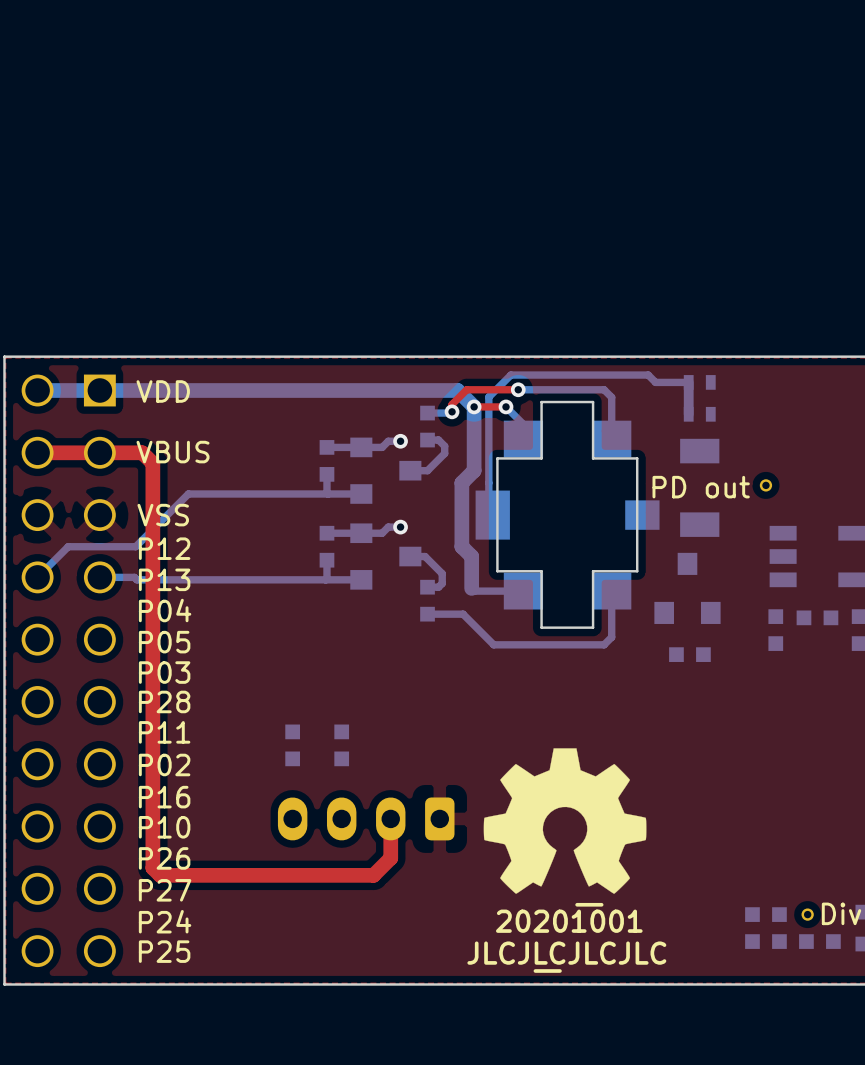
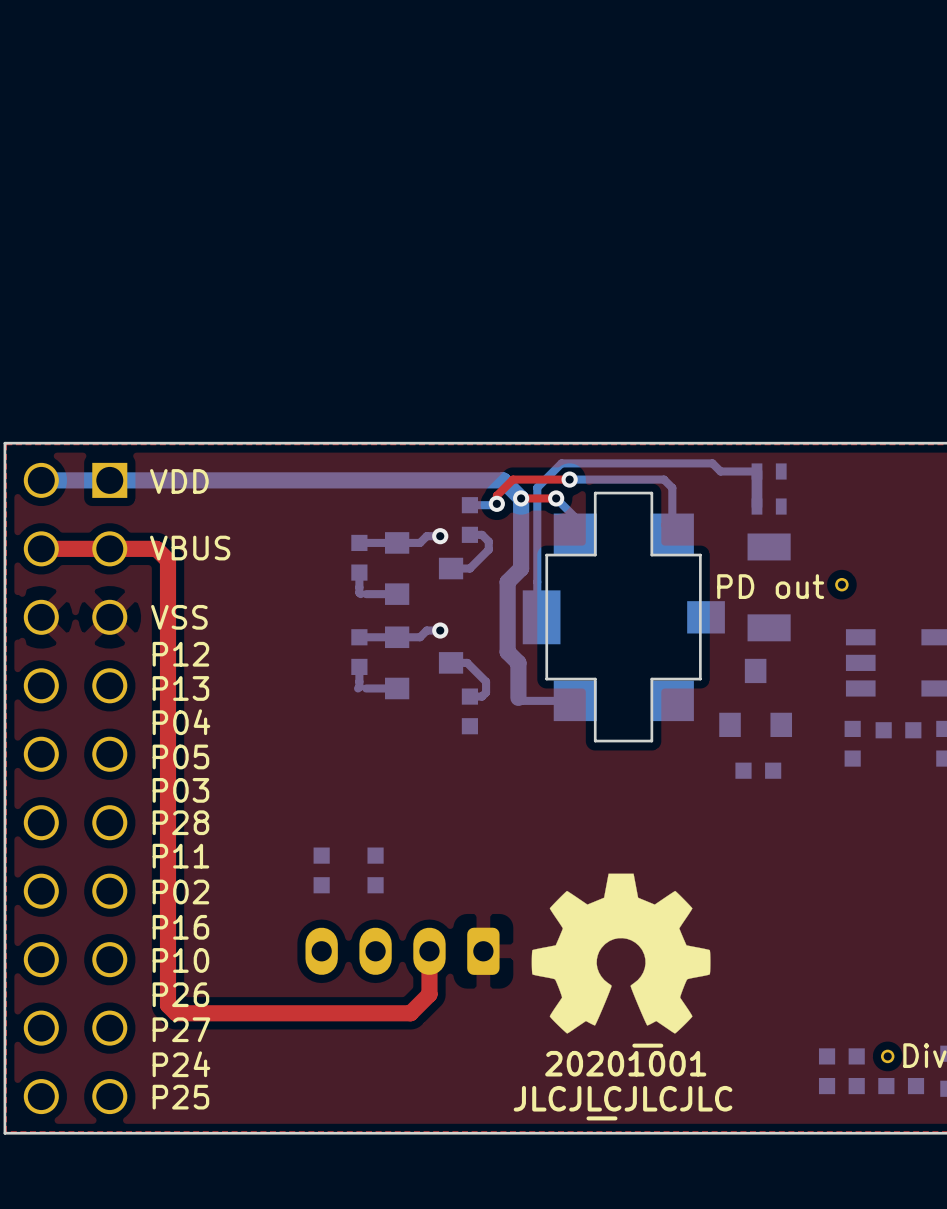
bottom track: (333, 494) (188, 494) (135, 546) (68, 546) (37, 577) -> none
bottom track: (99, 577) (134, 577) (136, 579) (333, 579) -> none
bottom track: (611, 591) (611, 637) (604, 644) (493, 644) (463, 614) (427, 614) -> none

